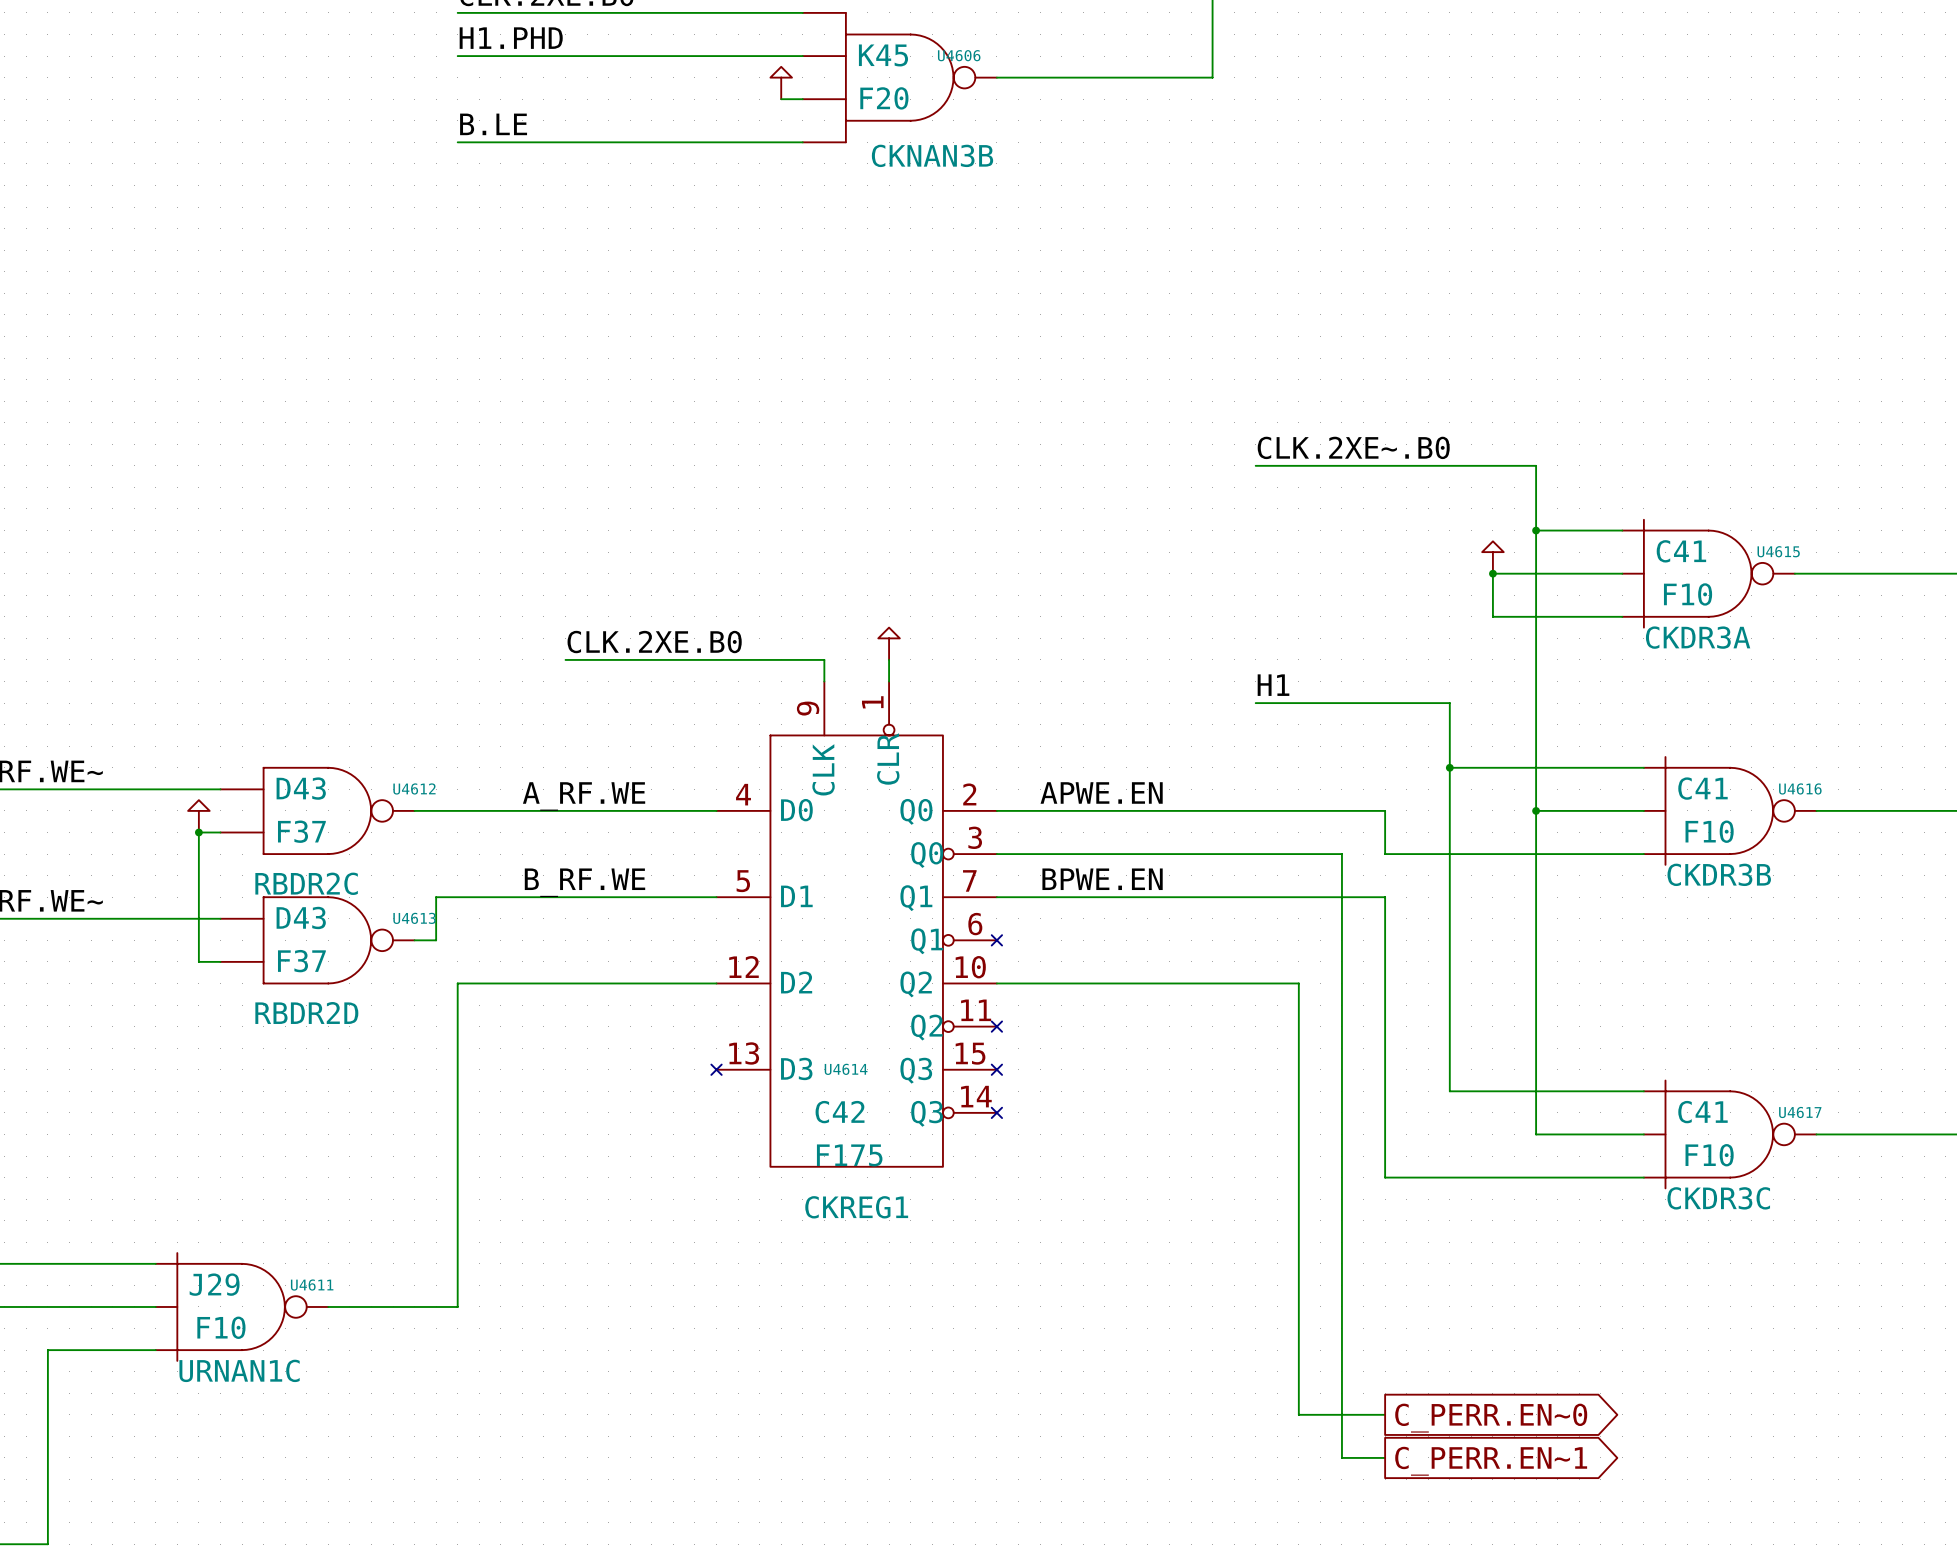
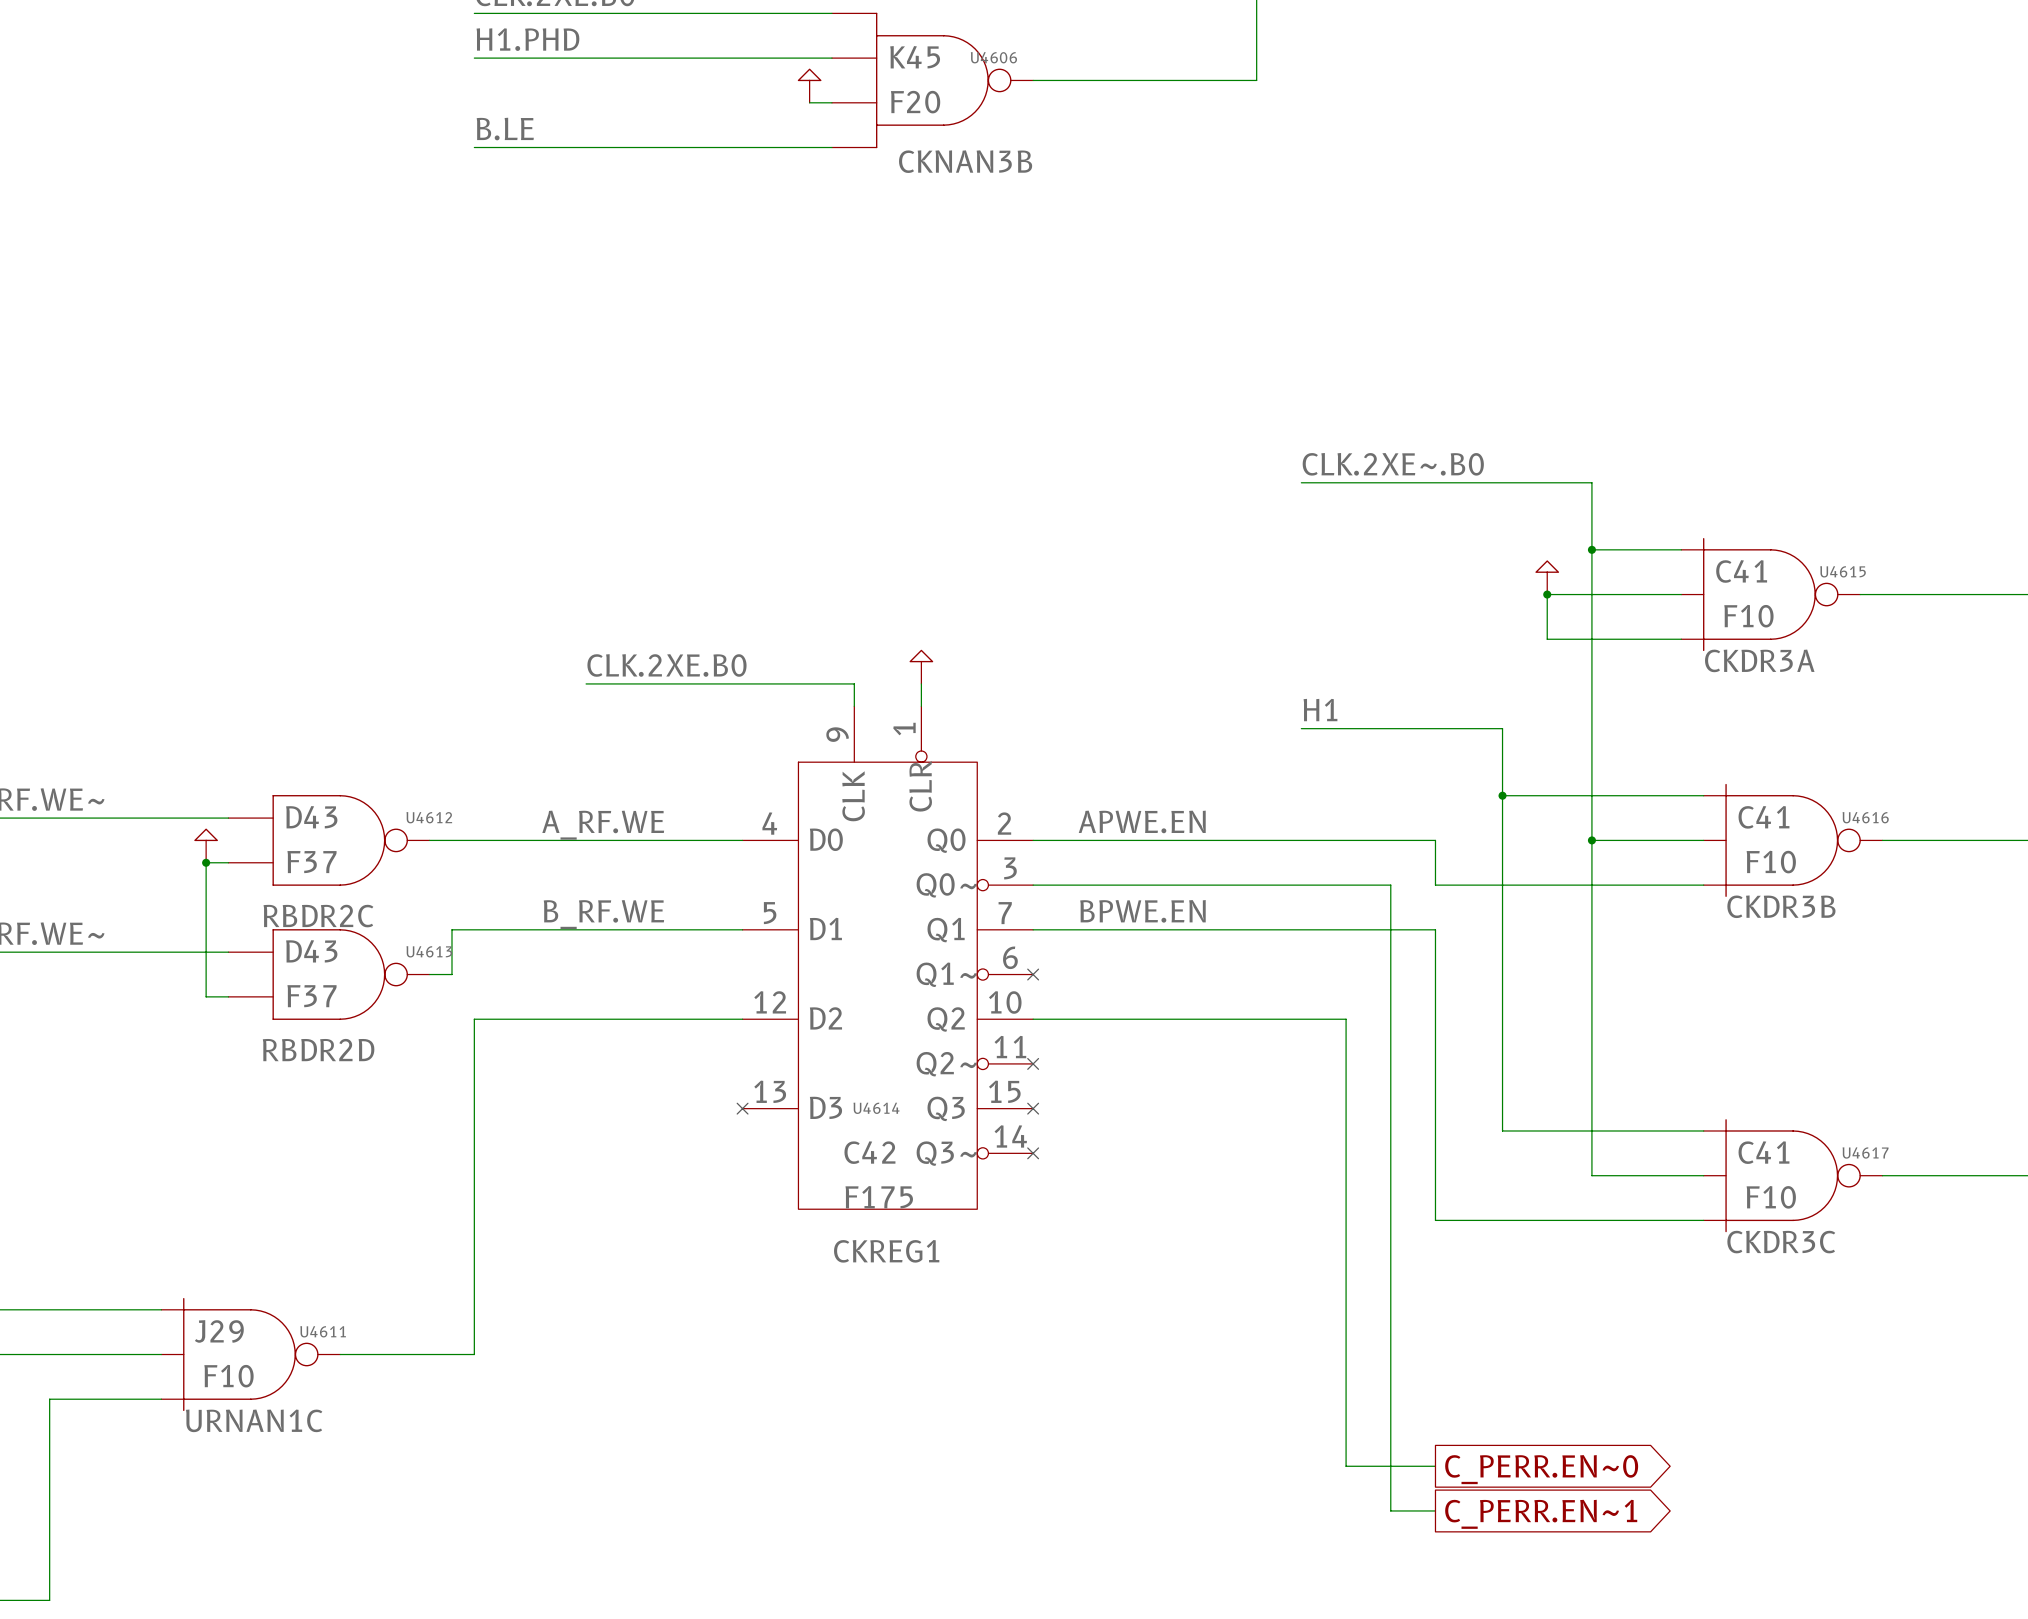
U4614 pin name: Q0 (927, 855) -> Q0~ (946, 885)
U4614 pin name: Q1 (927, 941) -> Q1~ (946, 974)
U4614 pin name: Q2 (926, 1027) -> Q2~ (946, 1064)
U4614 pin name: Q3 (927, 1113) -> Q3~ (946, 1153)

